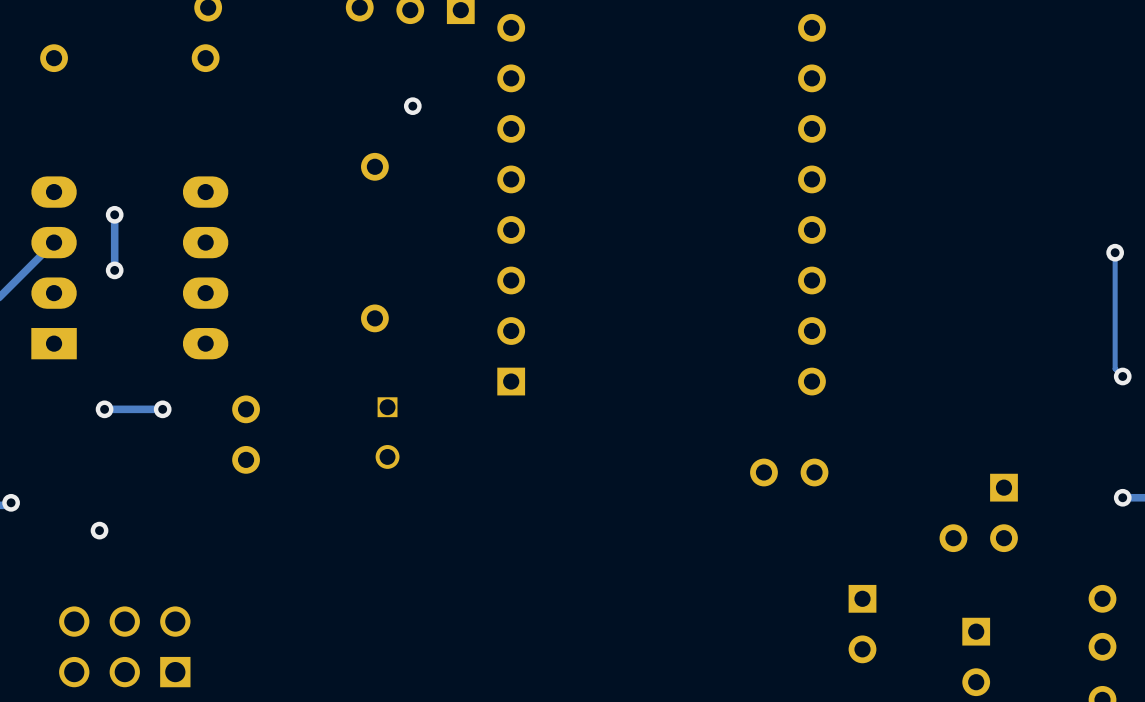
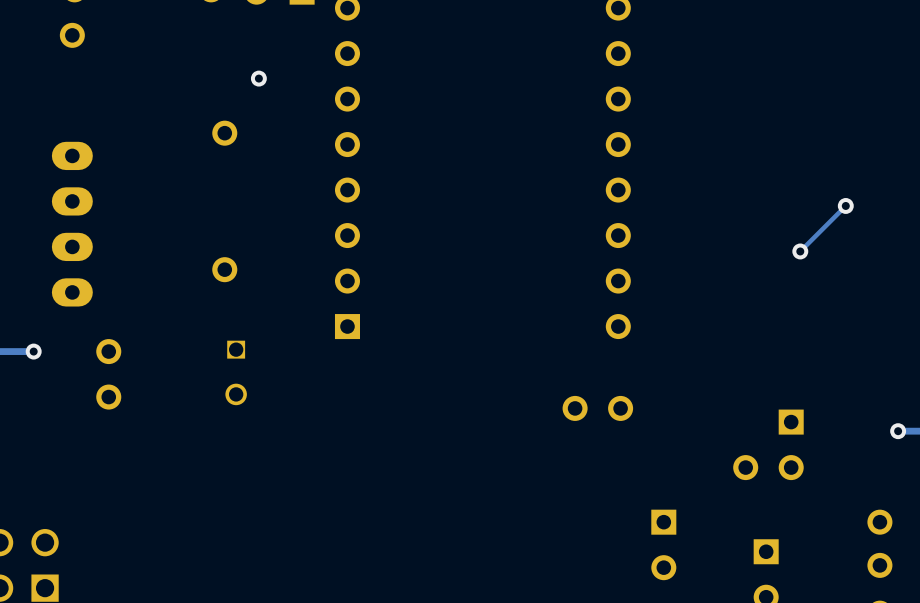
track: none -> (845, 205) (800, 251)
track: (1115, 252) (1115, 368) (1122, 376) -> none
via position: (1115, 252) -> (845, 205)
via: none -> (800, 251)
via: (1122, 376) -> none

